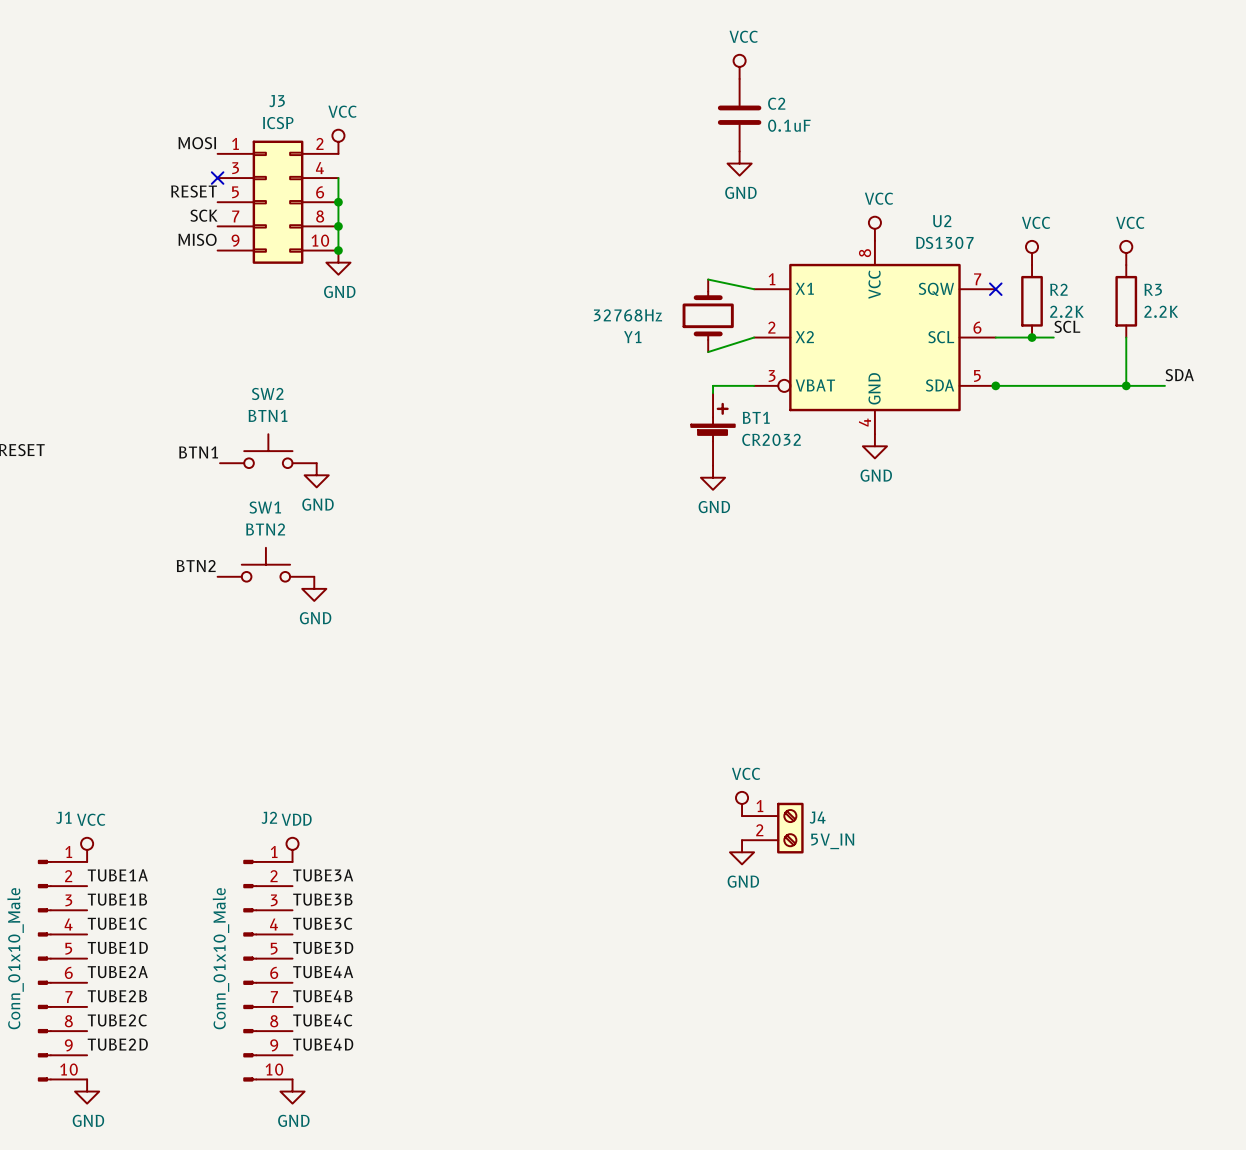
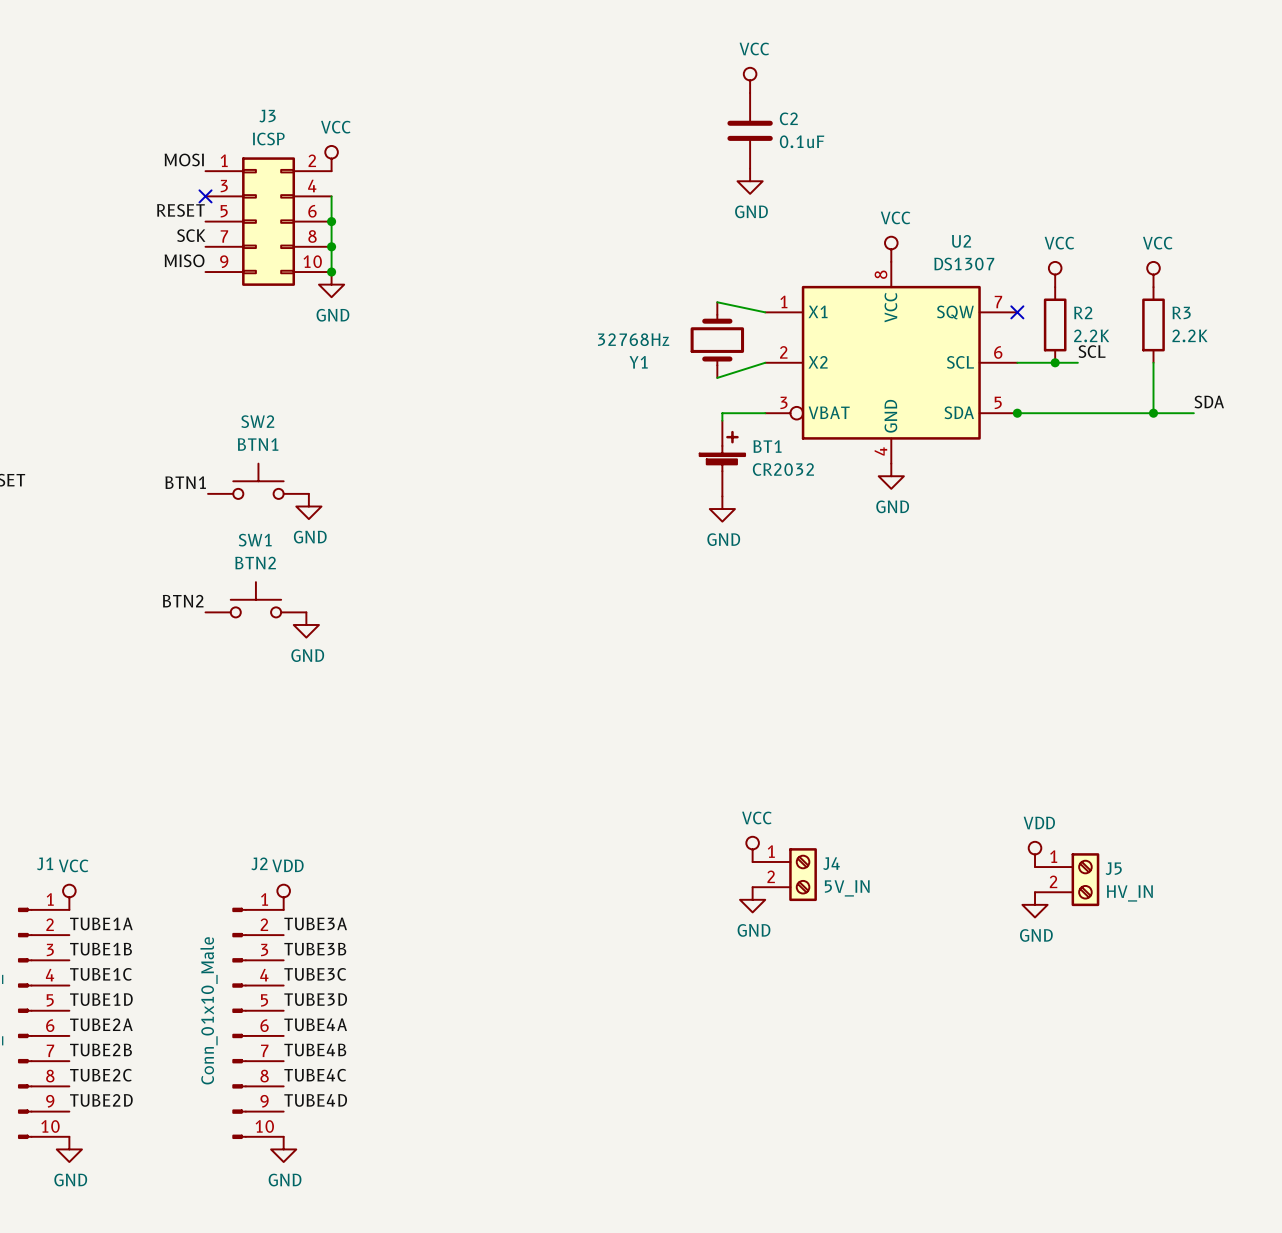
power symbol: none -> VDD (1035, 854)
J5: none -> HV_IN (1067, 879)
power symbol: none -> GND (1035, 904)

